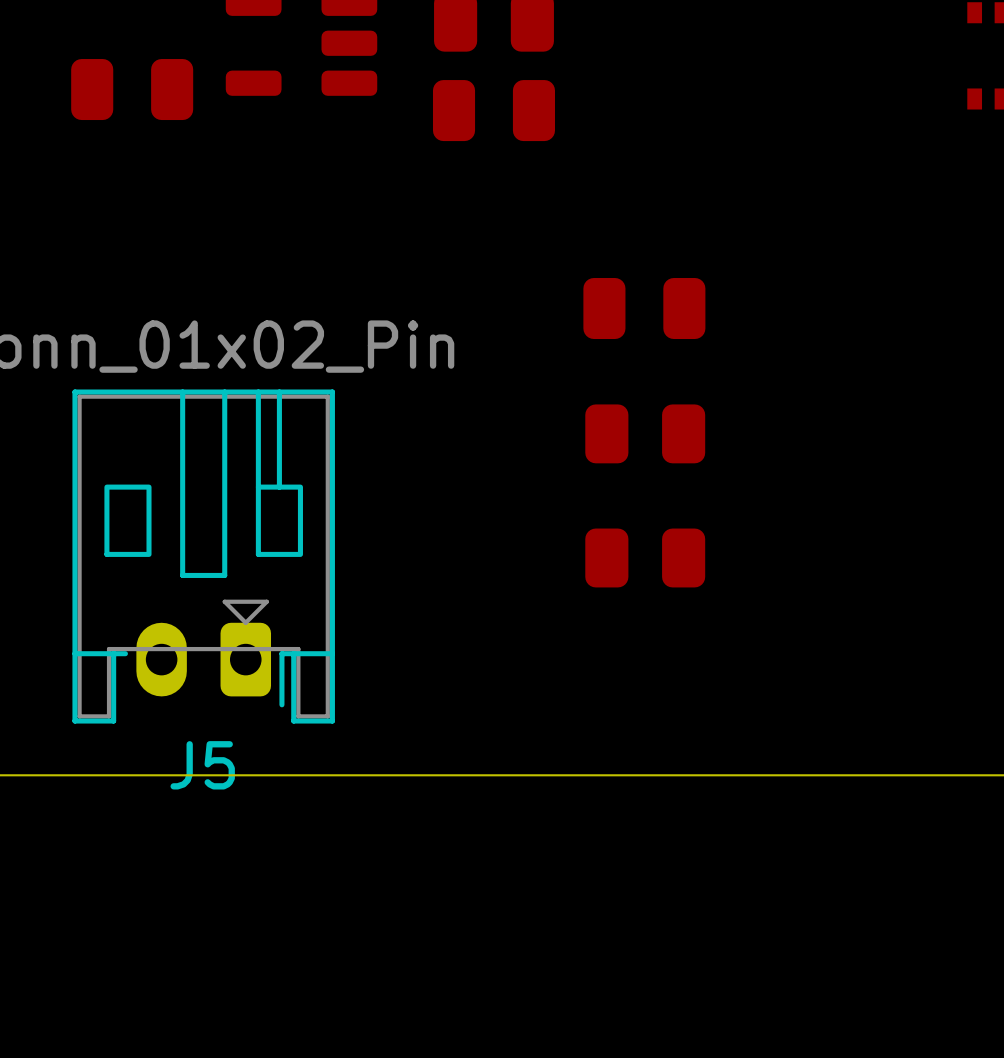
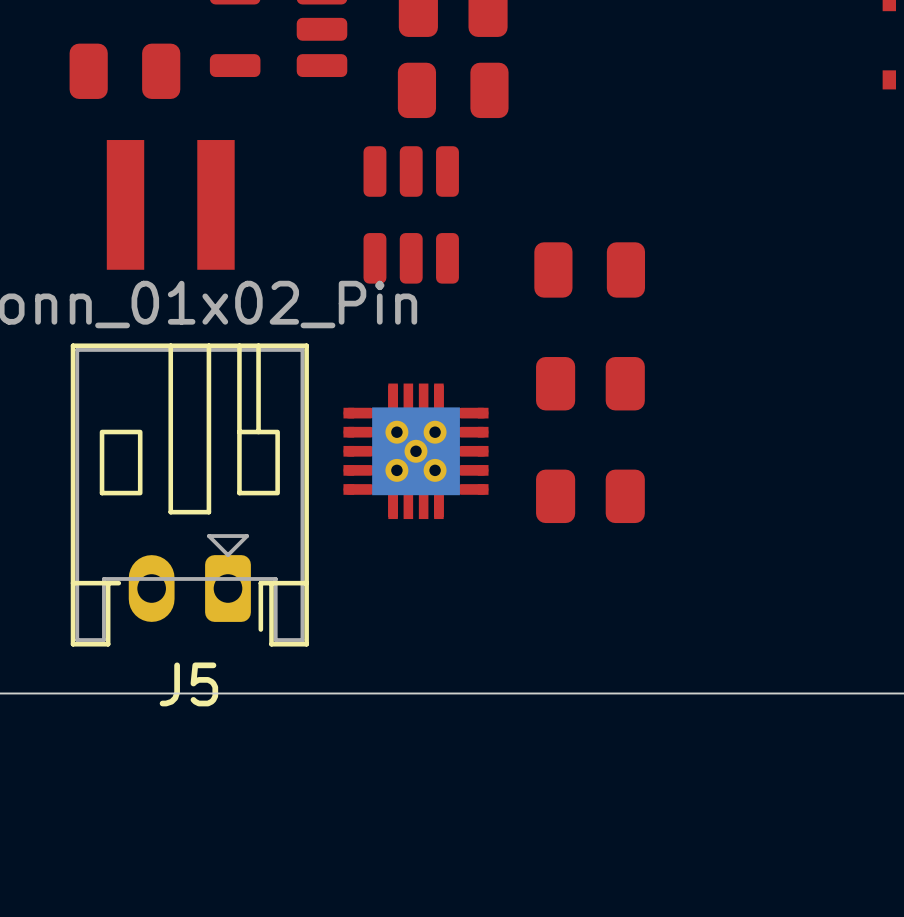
part: none -> (170, 204)
part: none -> (411, 214)
part: none -> (415, 451)

